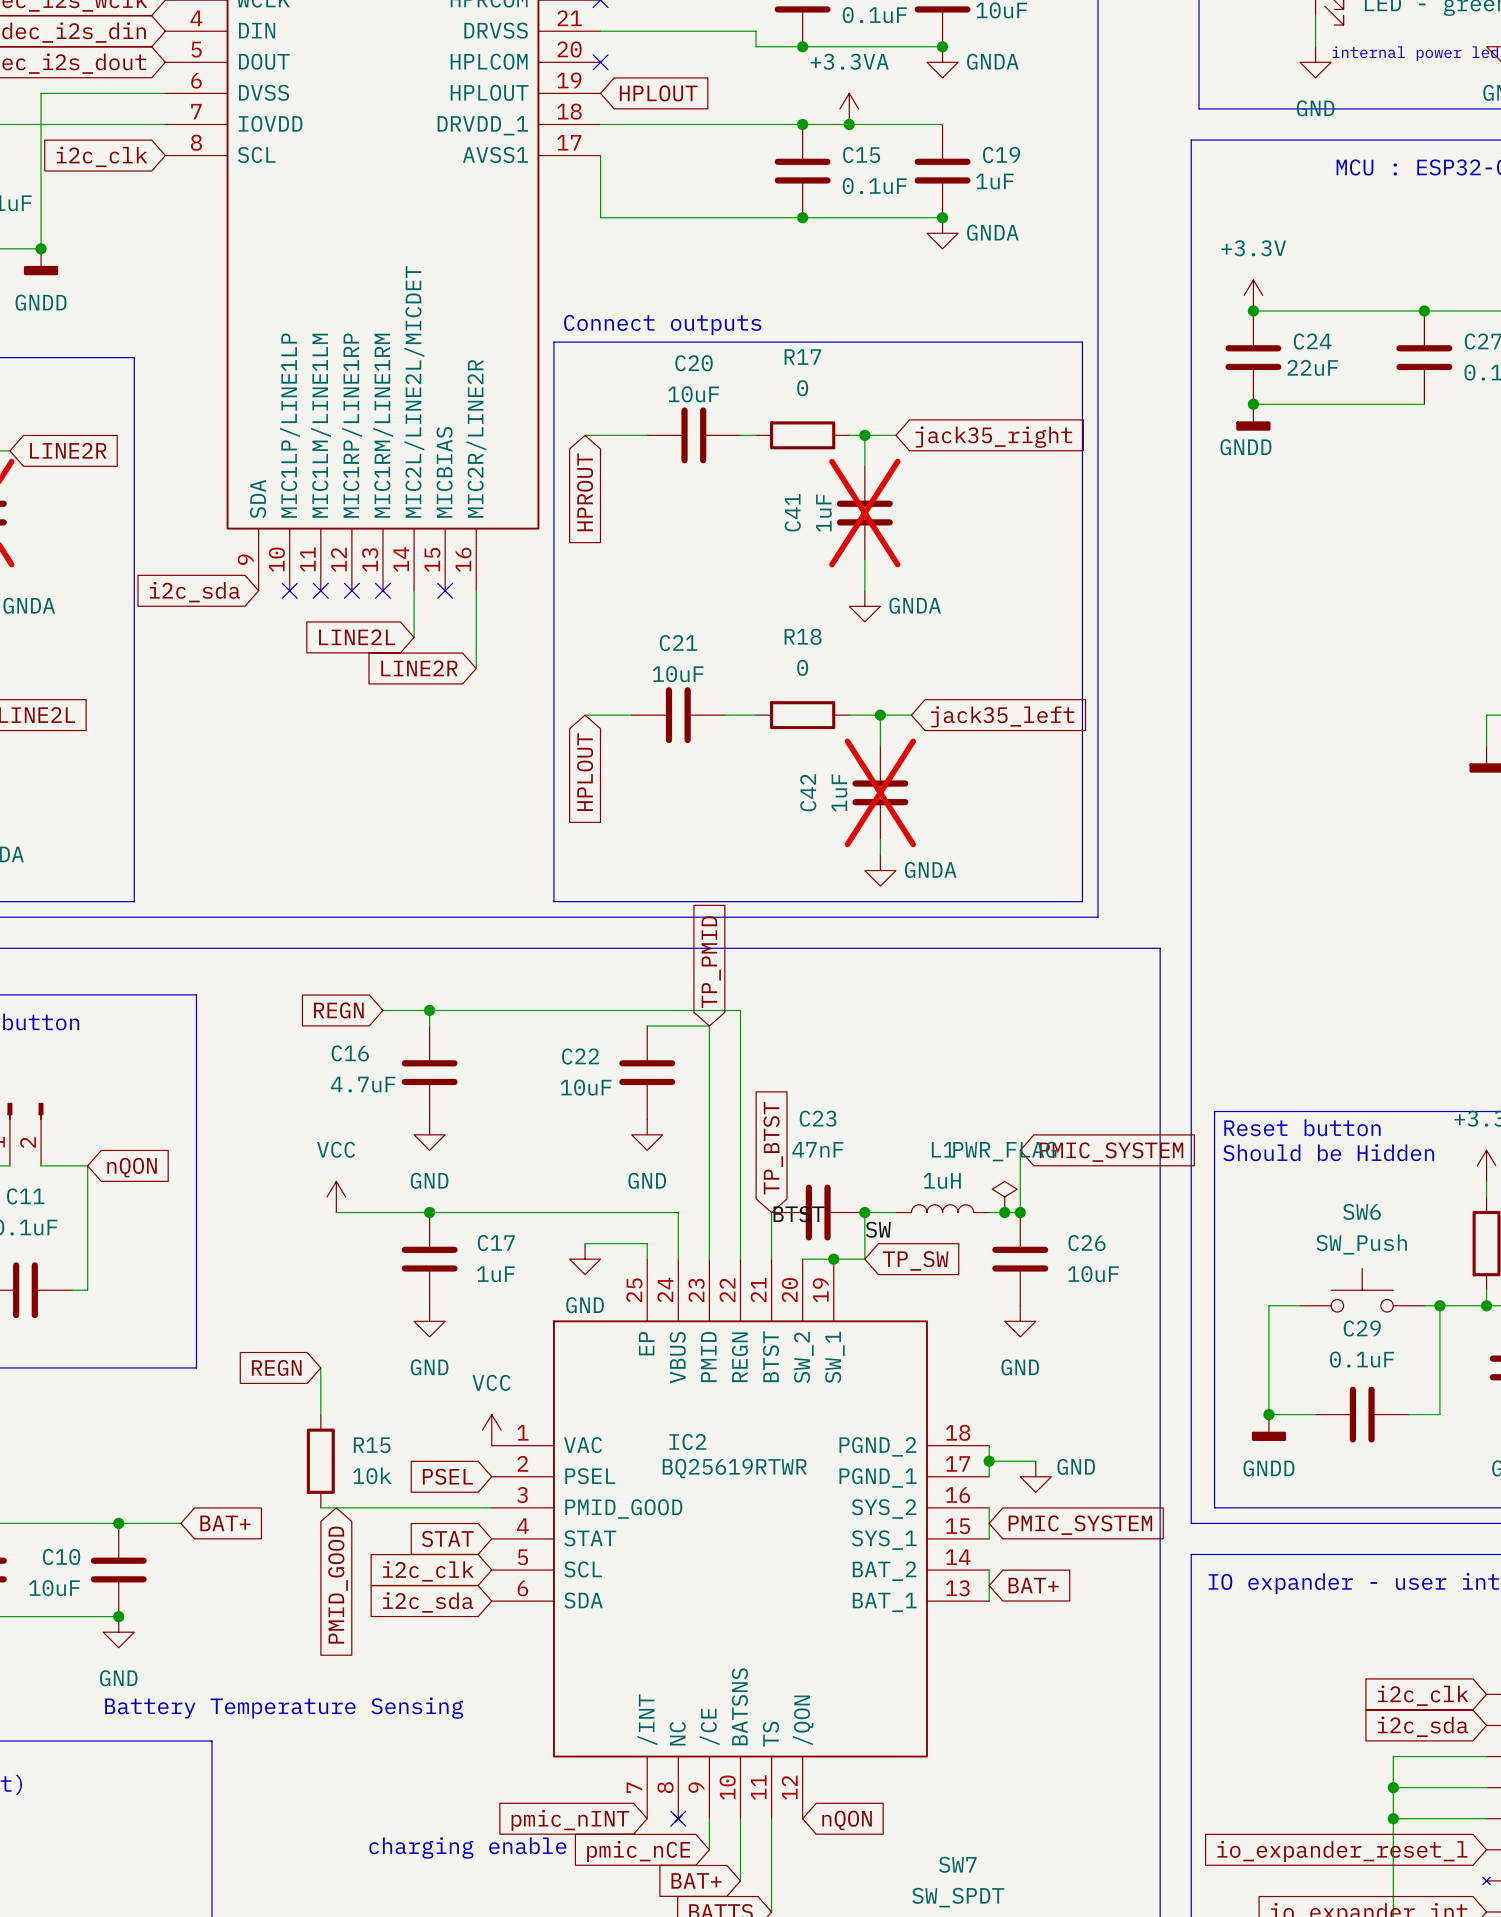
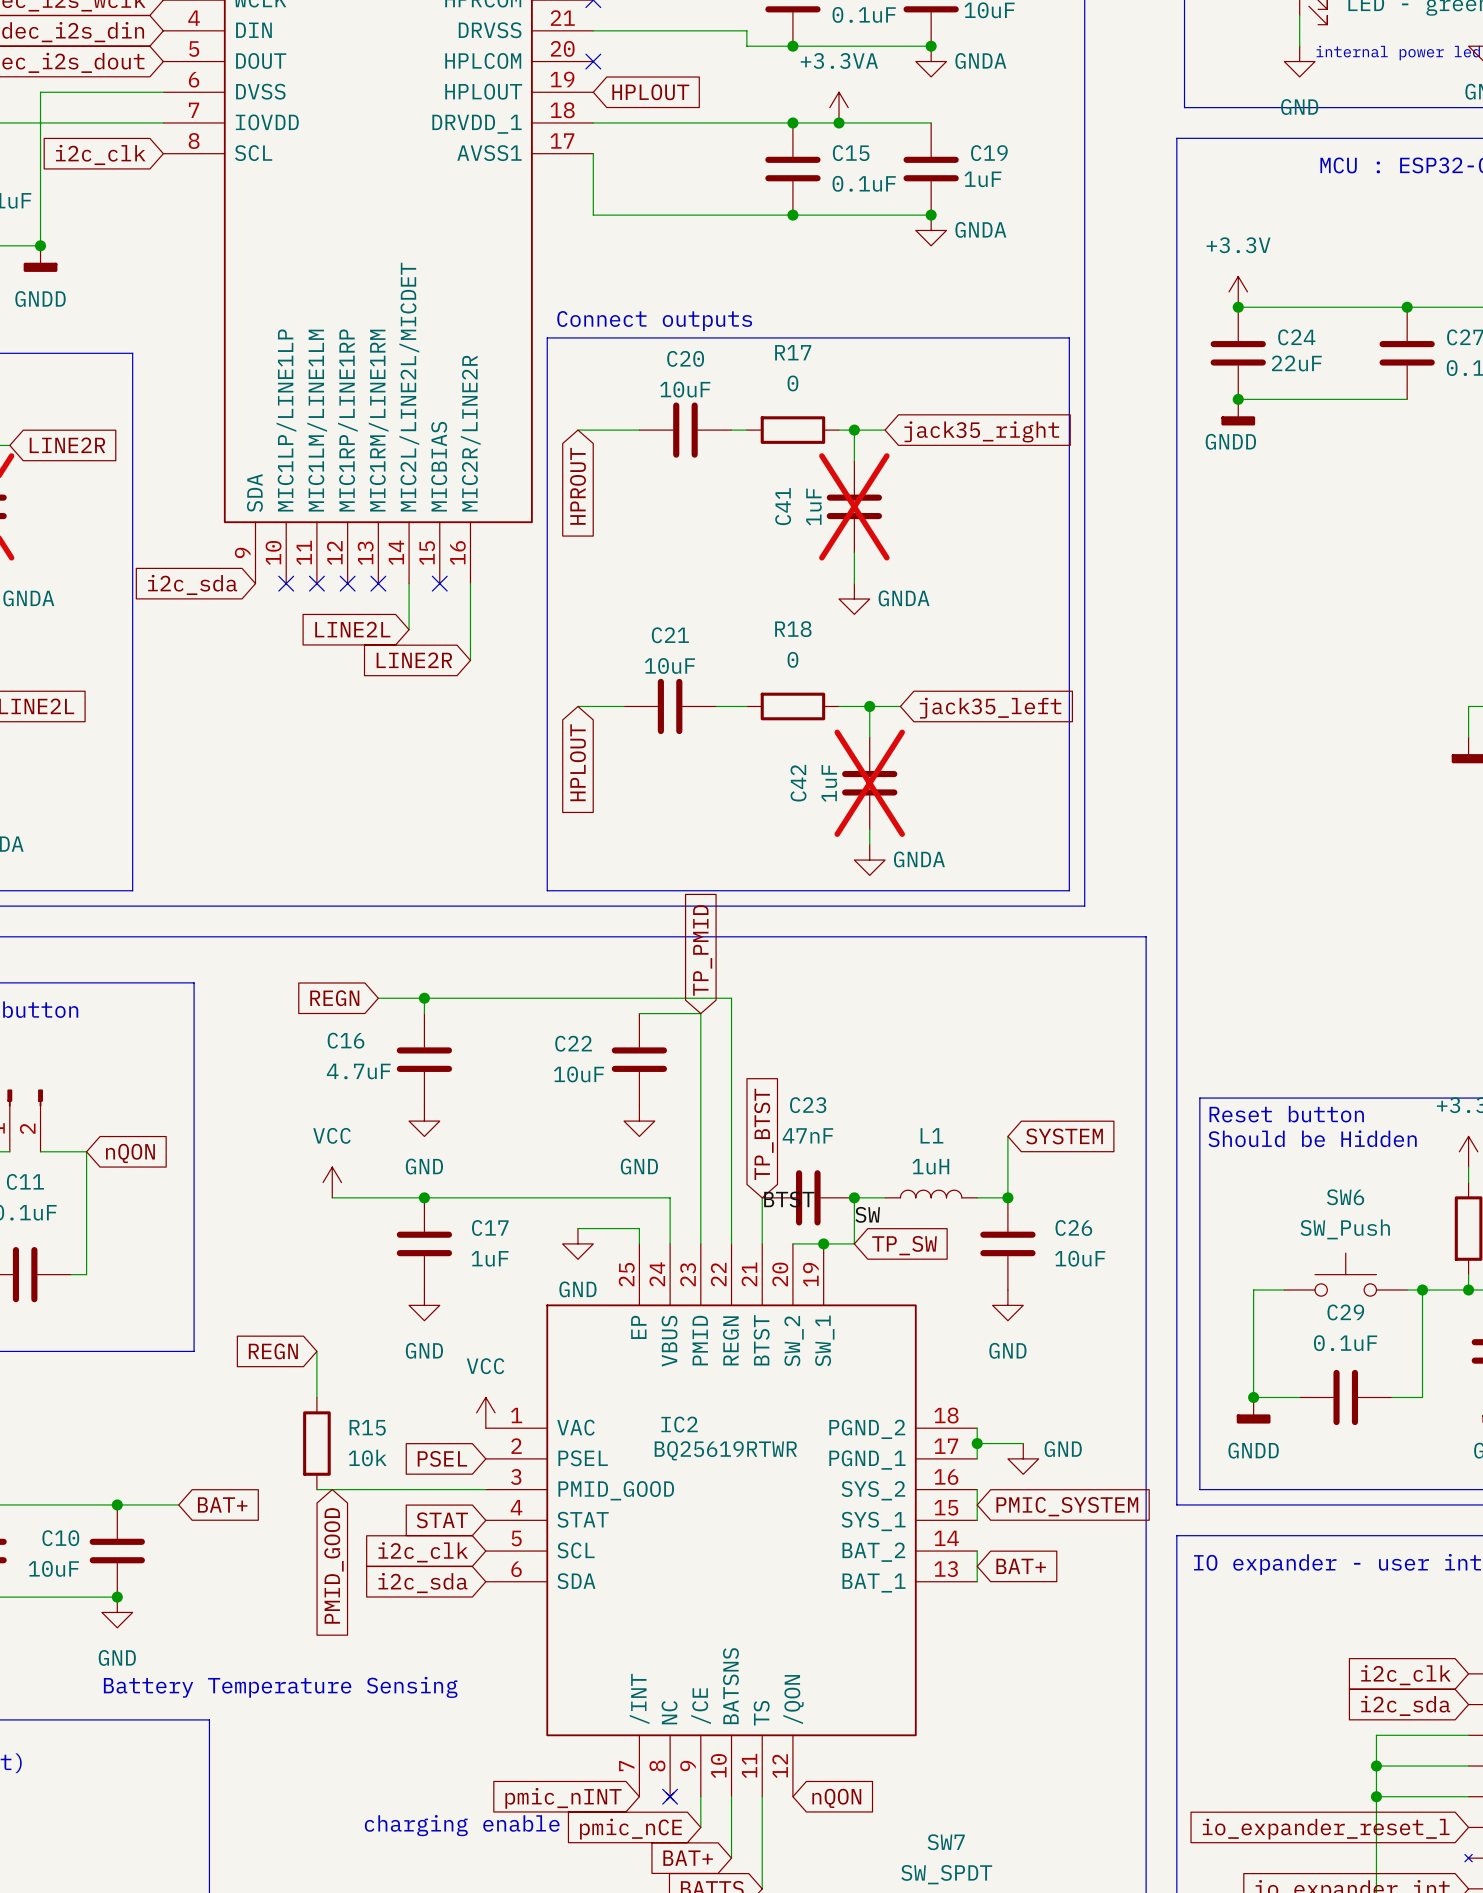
global label: PMIC_SYSTEM (1111, 1152) -> SYSTEM (1064, 1136)
power symbol: PWR_FLAG (1004, 1196) -> none
junction: (1004, 1212) -> none

